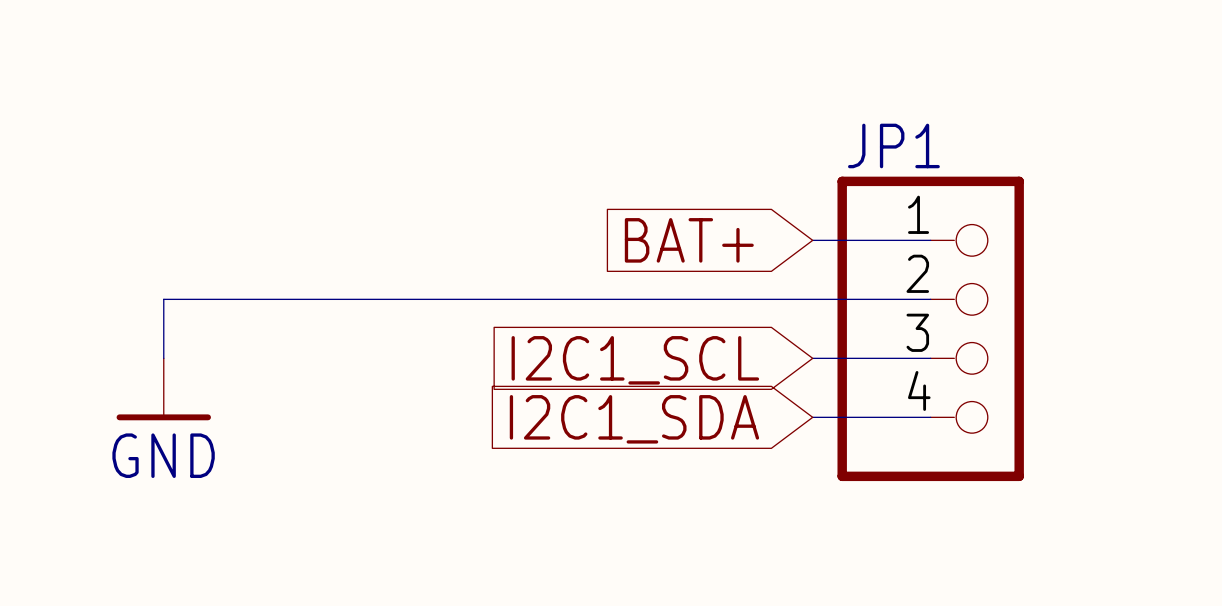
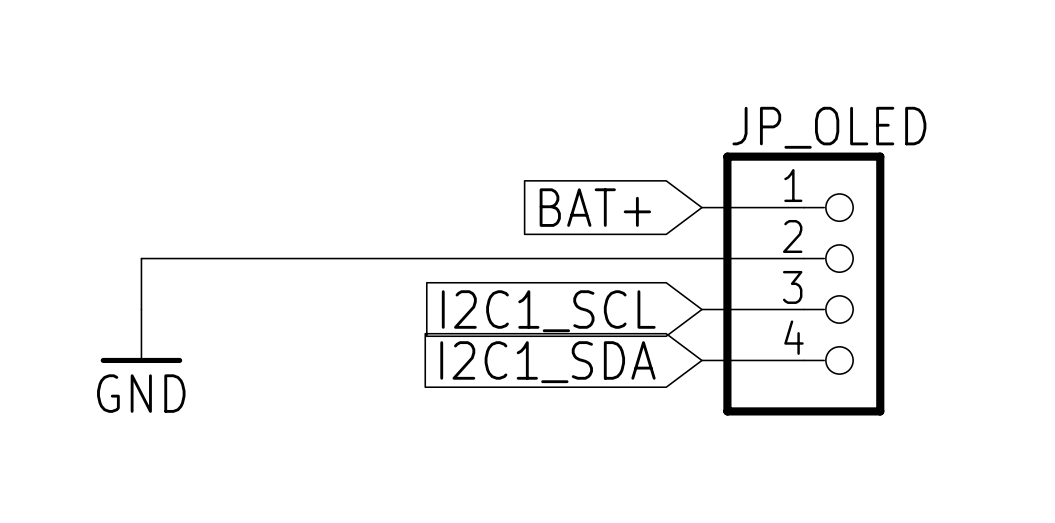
JP1 name: JP1 (893, 145) -> JP_OLED (829, 127)

